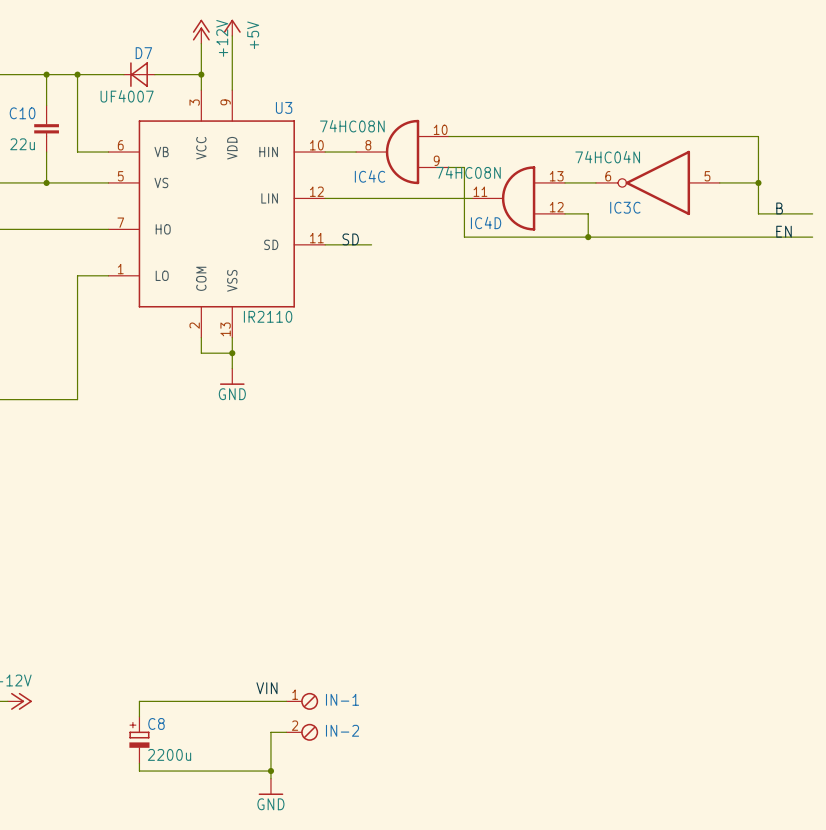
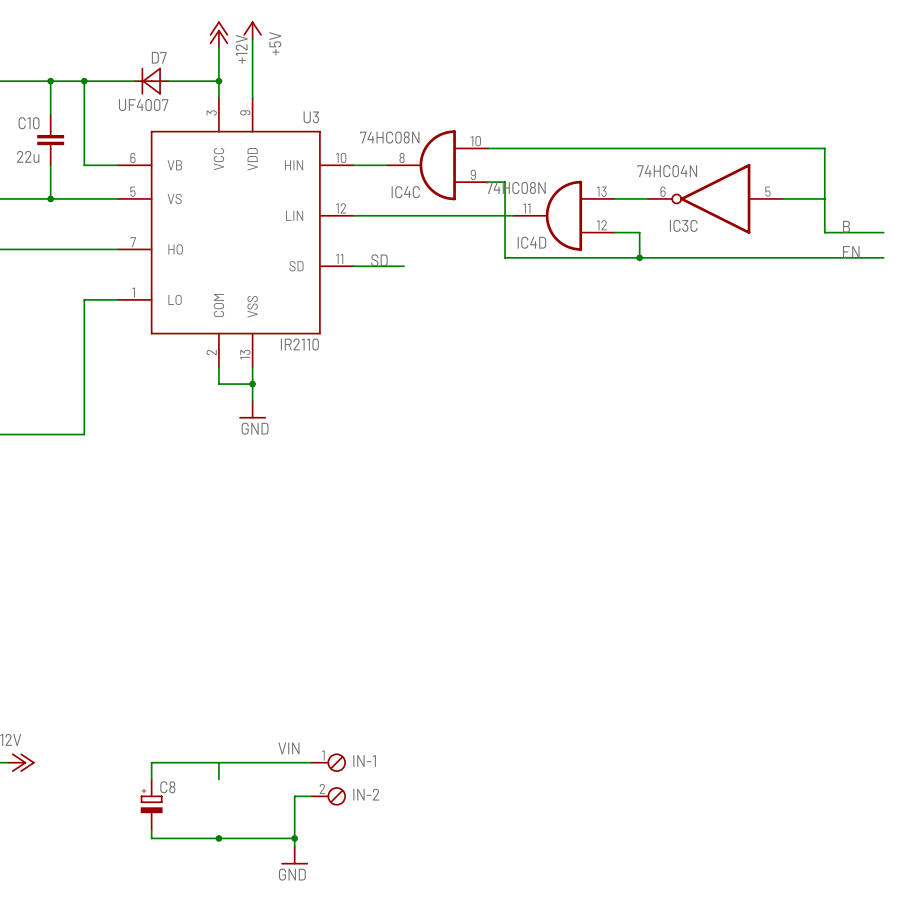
junction: (758, 182) -> none
wire: none -> (218, 762) (218, 779)
C8 value: 2200u (169, 754) -> none
junction: none -> (218, 838)

